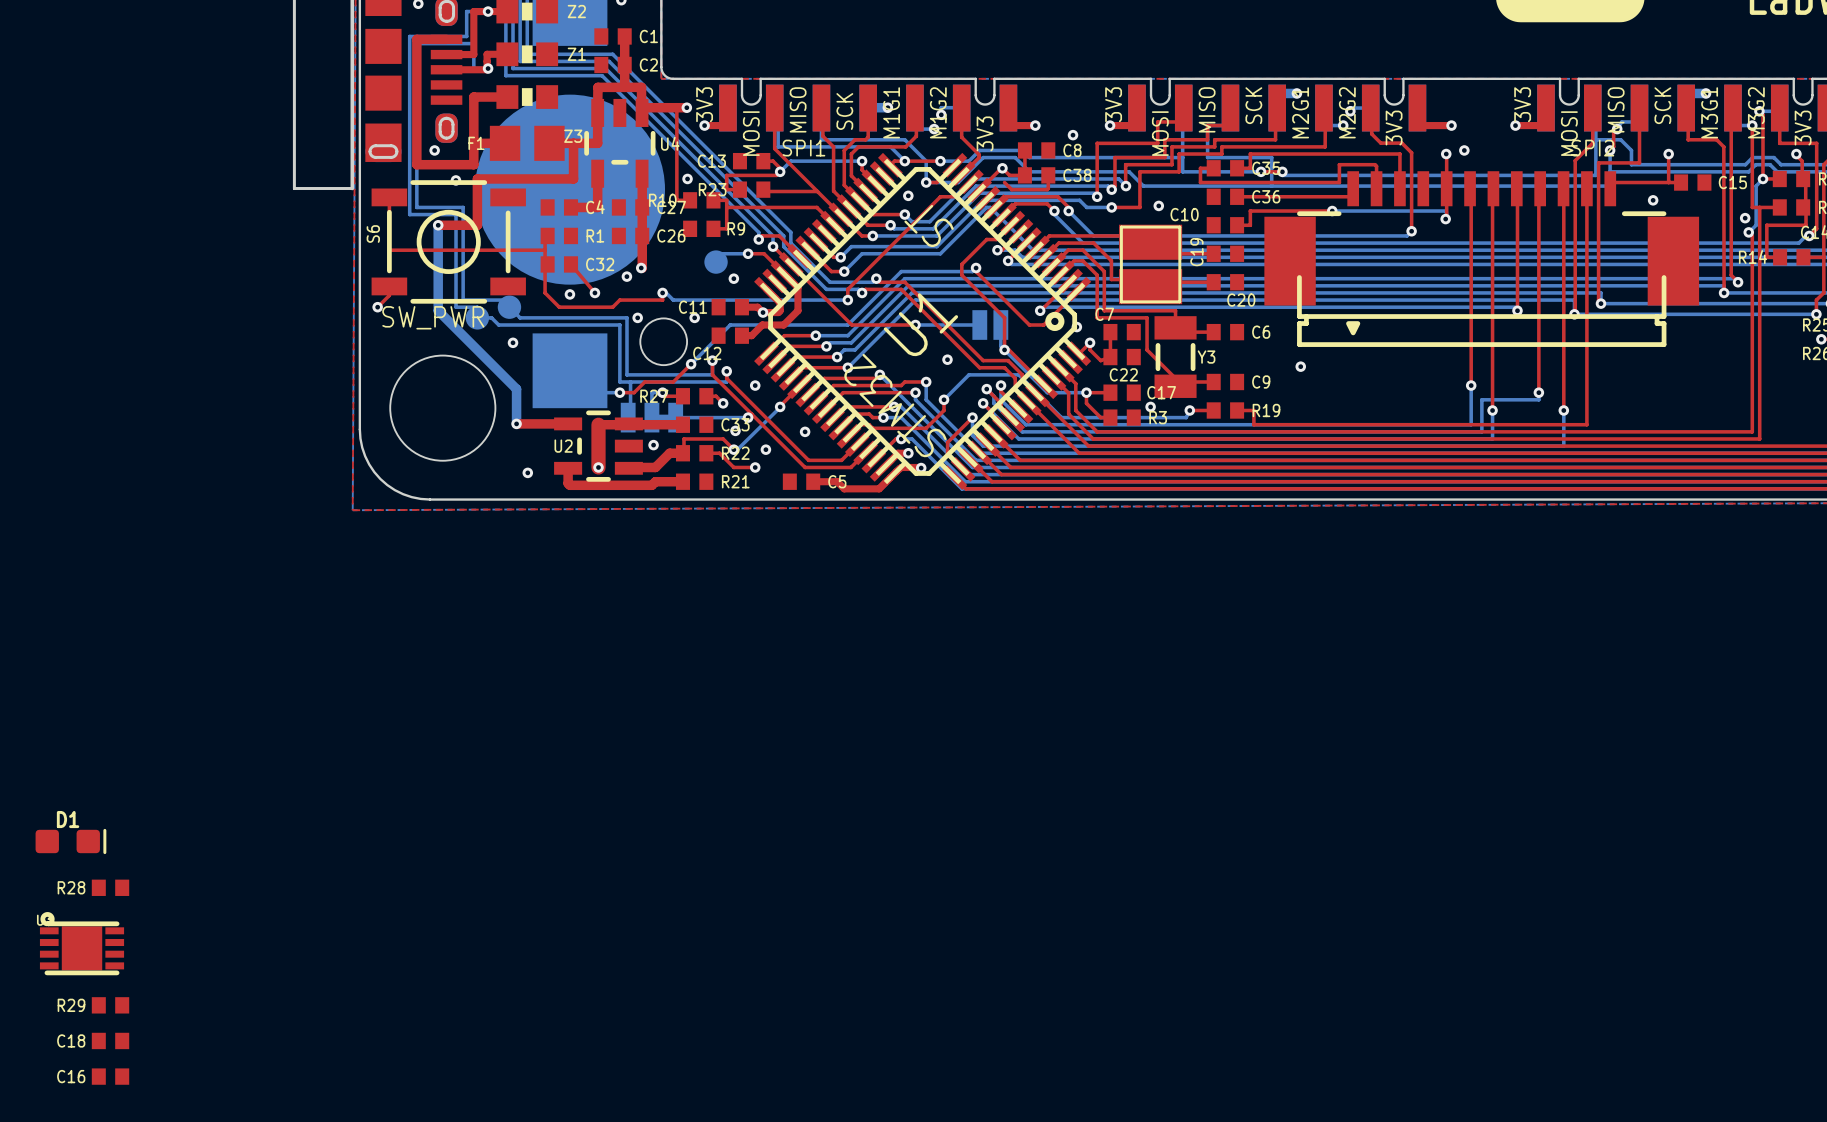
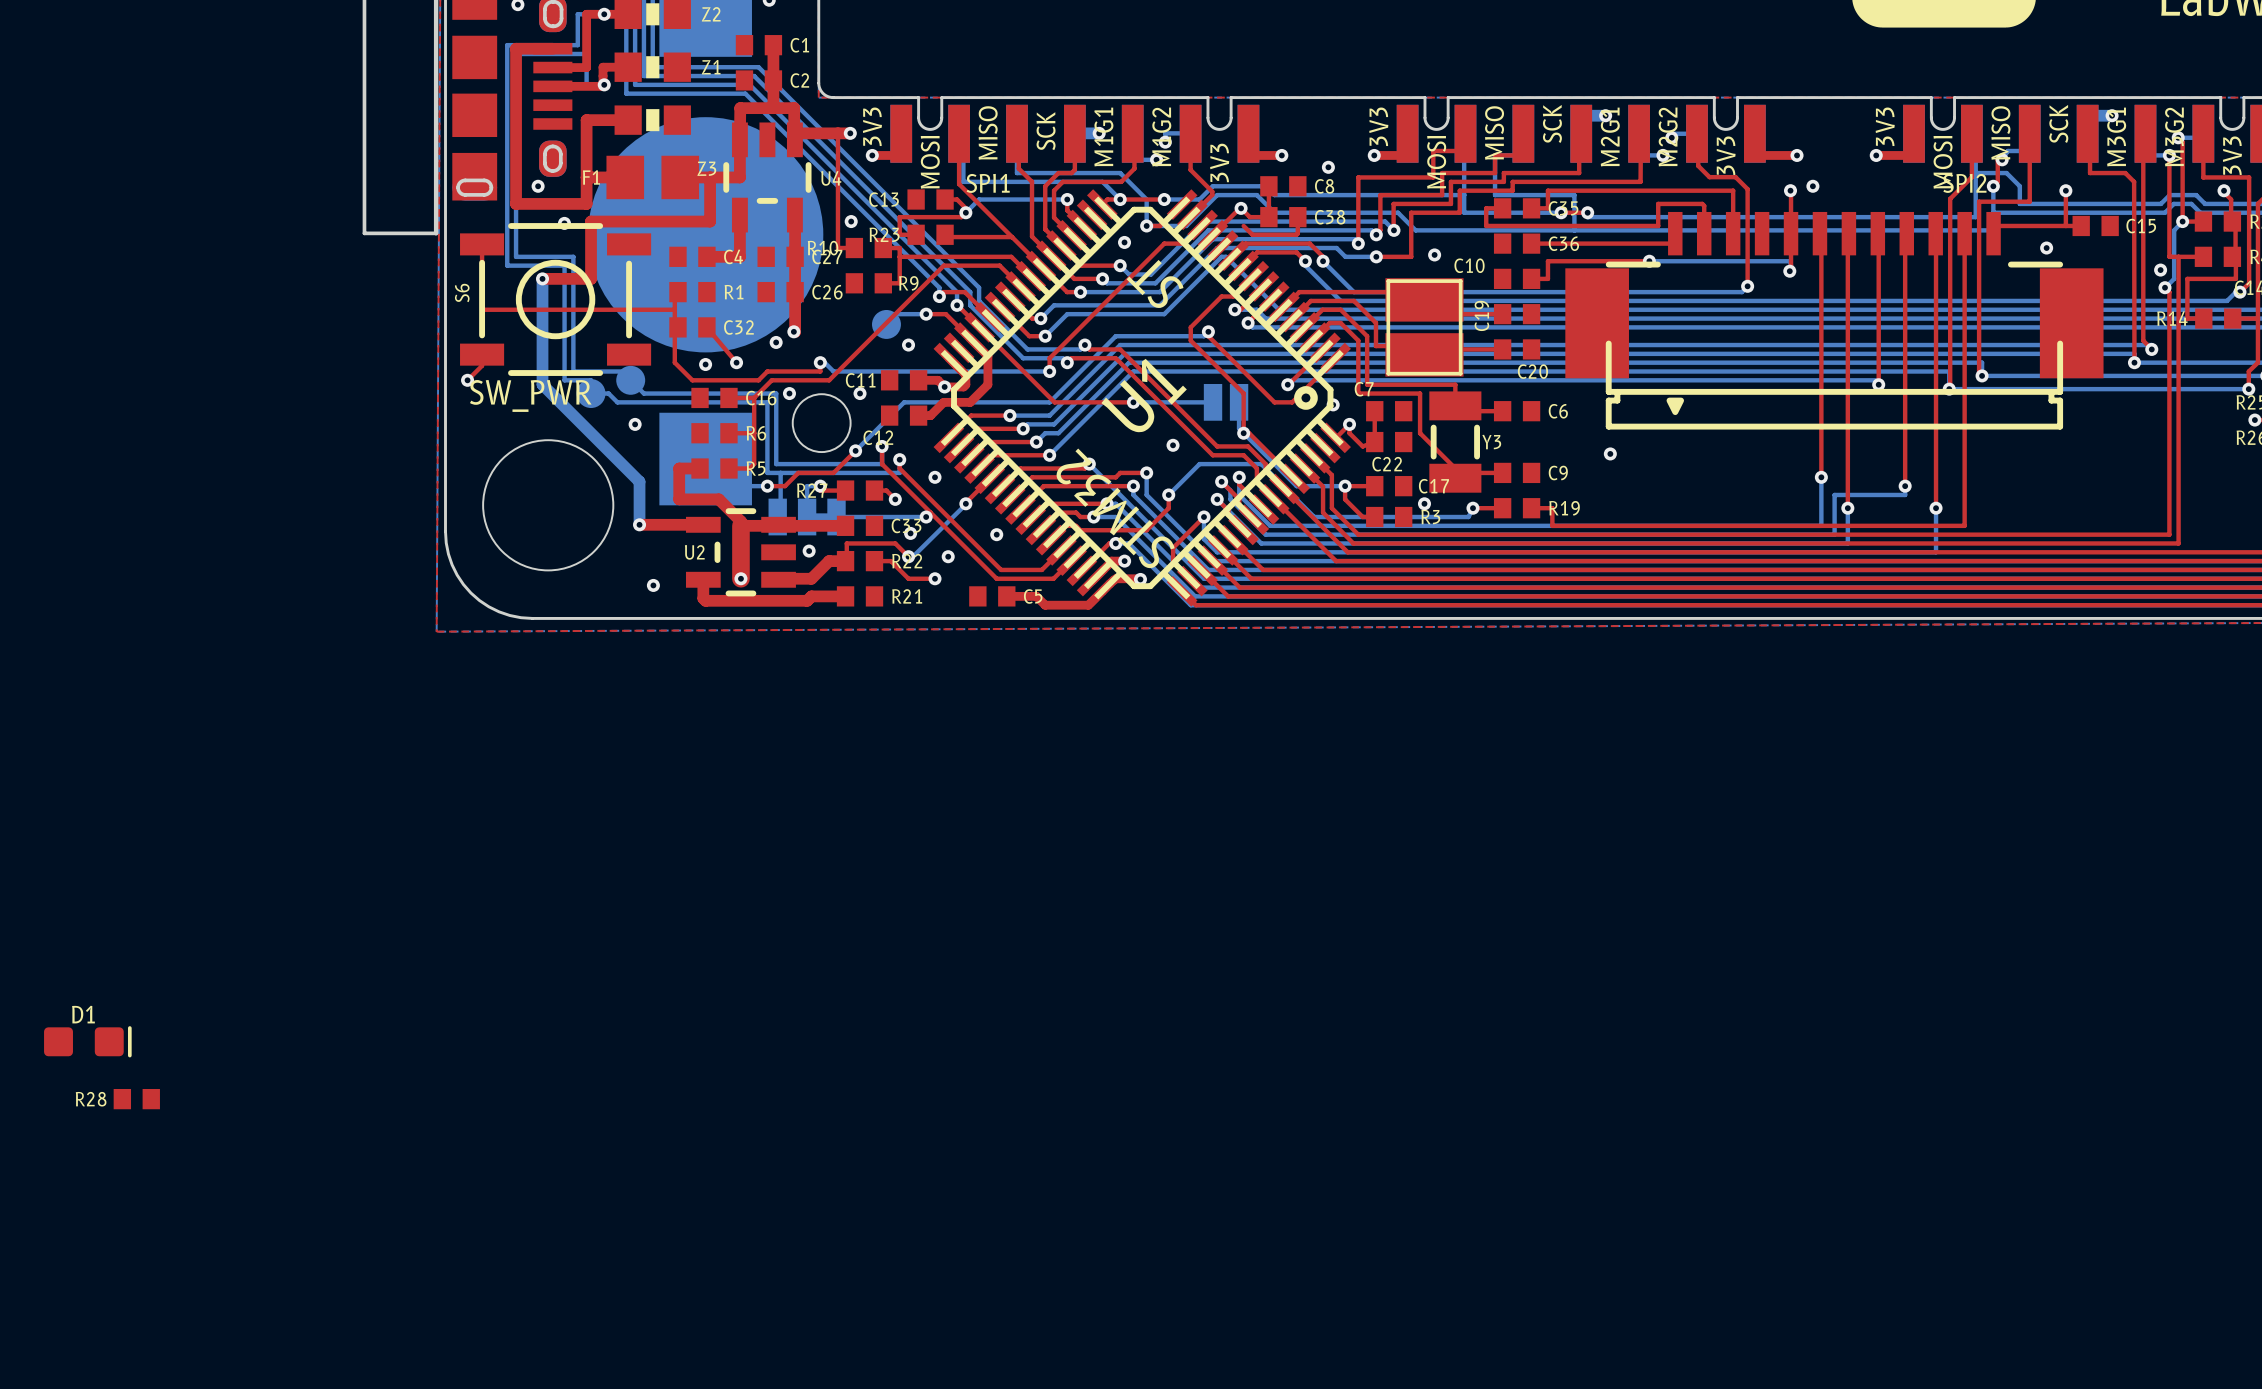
top track: none -> (1020, 286) (999, 265) (943, 265) (829, 380) (771, 380) (754, 397)
top track: none -> (728, 397) (754, 397)
top track: none -> (754, 397) (754, 464) (749, 468) (728, 468)
R6: none -> (714, 433)
top track: none -> (728, 433) (754, 433)
top track: none -> (700, 468) (679, 468) (679, 499) (718, 499) (740, 521) (740, 525)
R5: none -> (714, 468)
part: (82, 943) -> none
R29: (110, 1005) -> none
C18: (110, 1040) -> none
C16 name position: C16 (71, 1076) -> C16 (761, 398)
C16 position: (110, 1076) -> (714, 397)

